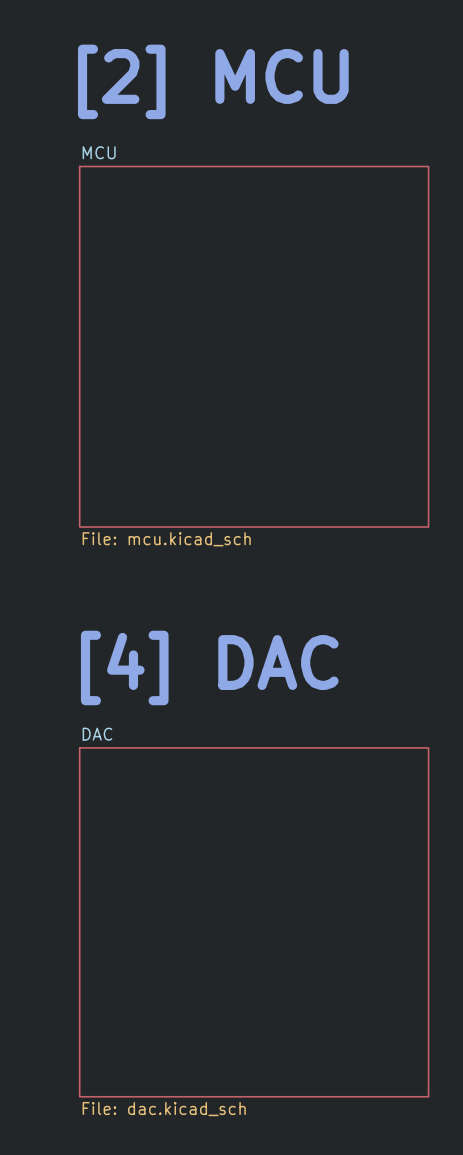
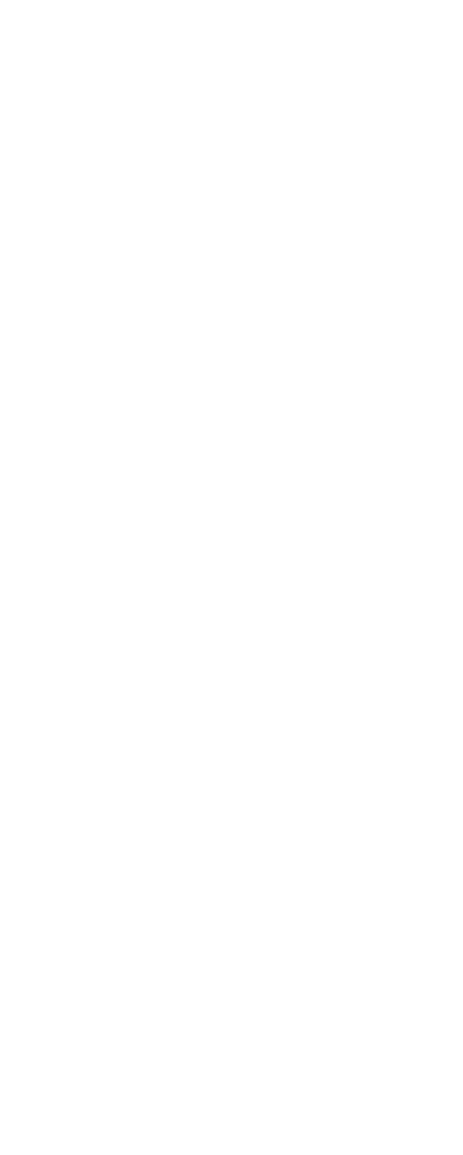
text: [2] MCU (213, 81) -> none
sheet MCU: File: mcu.kicad_sch (254, 346) -> none
text: [4] DAC (209, 667) -> none
sheet DAC: File: dac.kicad_sch (254, 922) -> none

